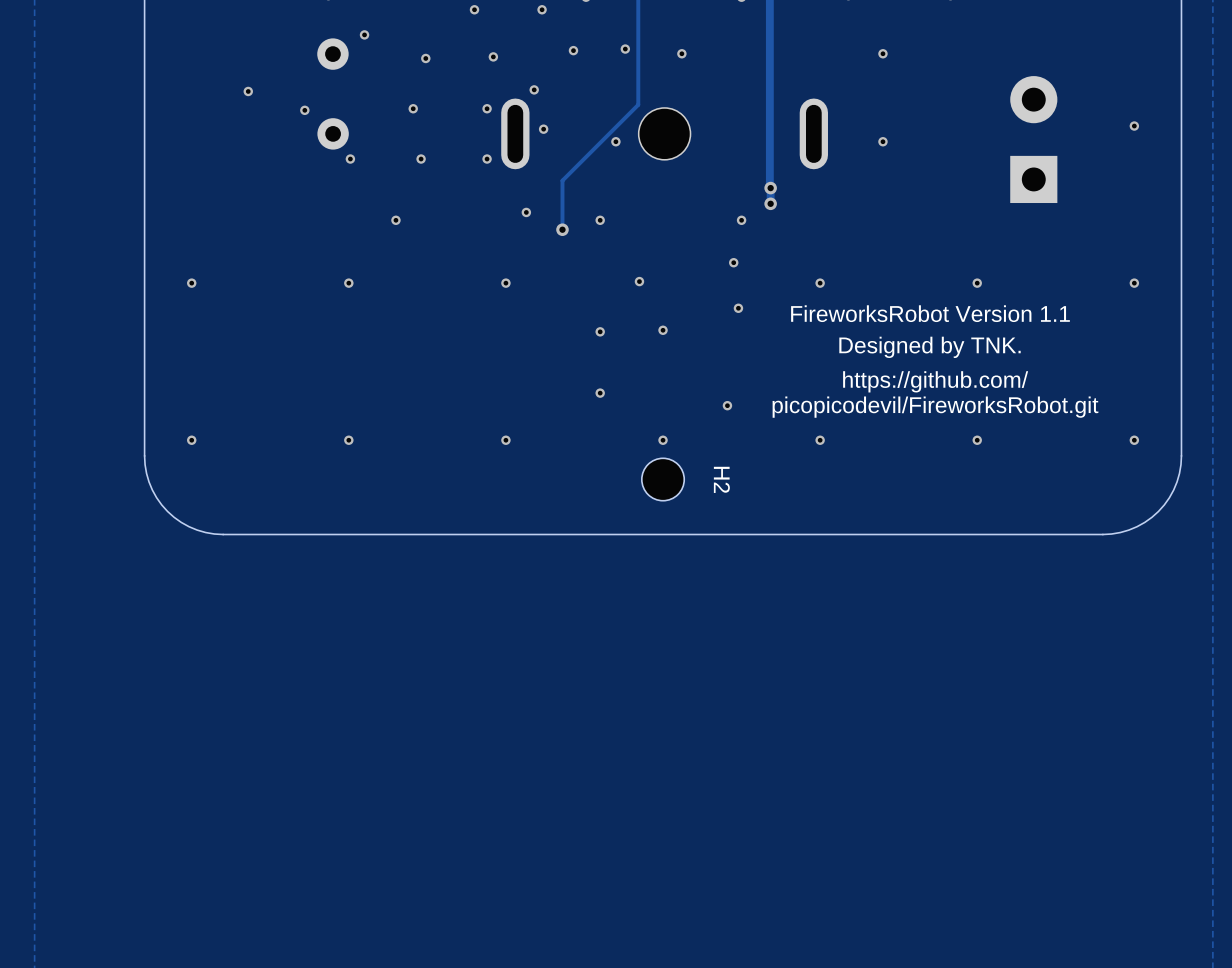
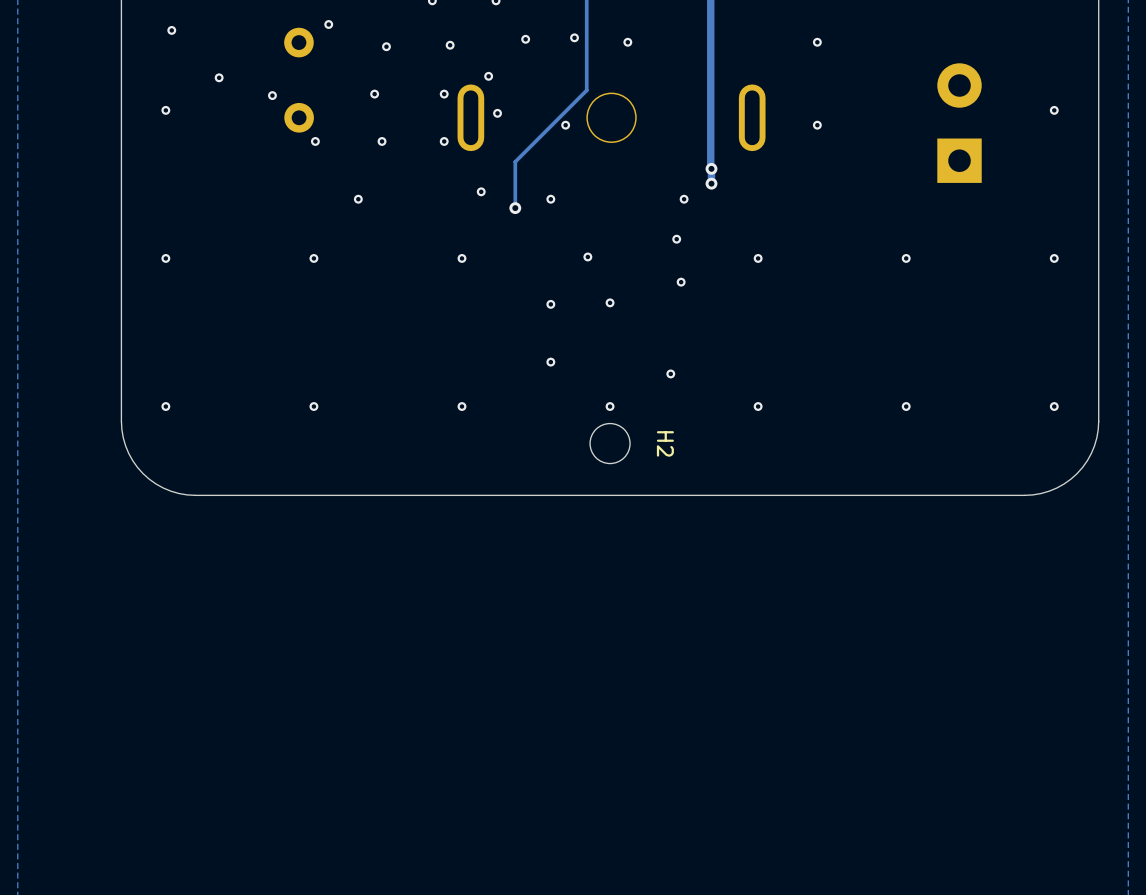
via: none -> (171, 30)
via: none -> (165, 110)
text: FireworksRobot Version 1.1 (930, 313) -> none
text: Designed by TNK. (930, 347) -> none
text: https://github.com/ (935, 381) -> none
text: picopicodevil/FireworksRobot.git (935, 407) -> none

